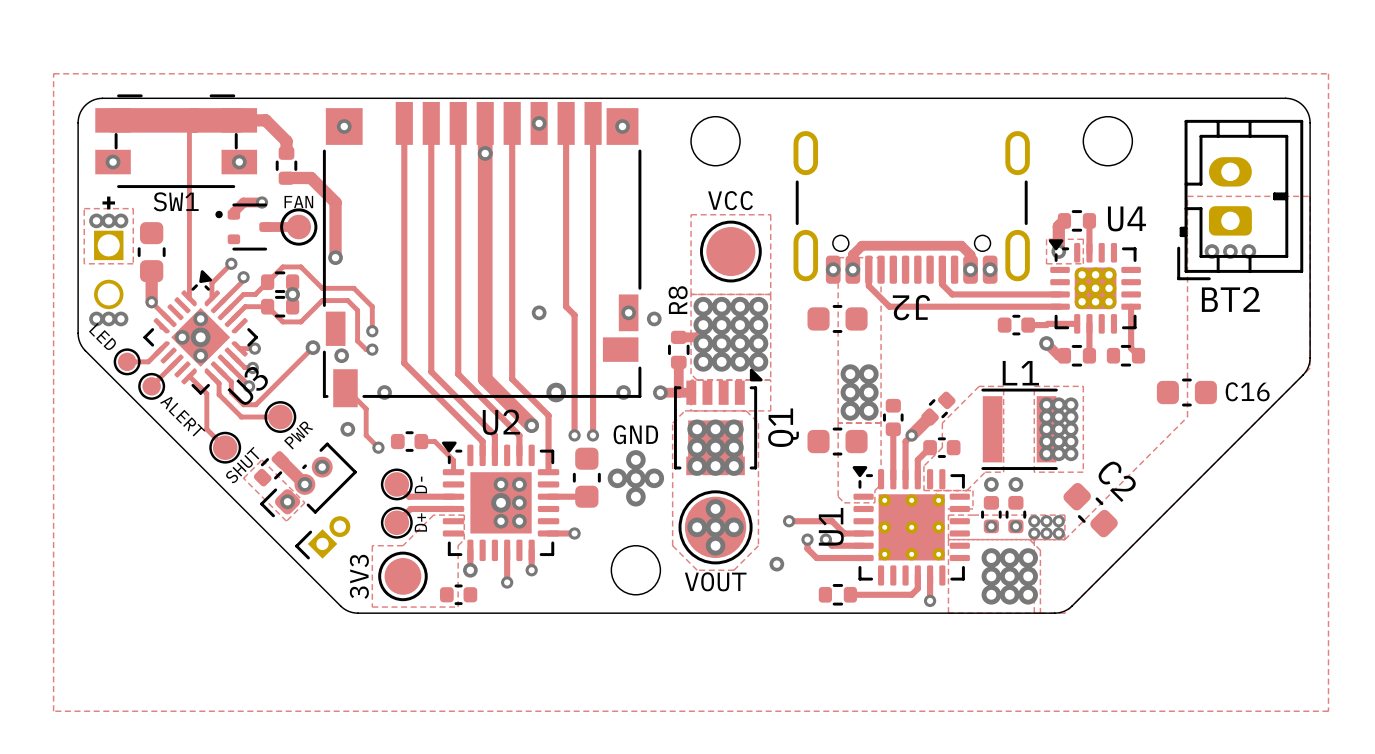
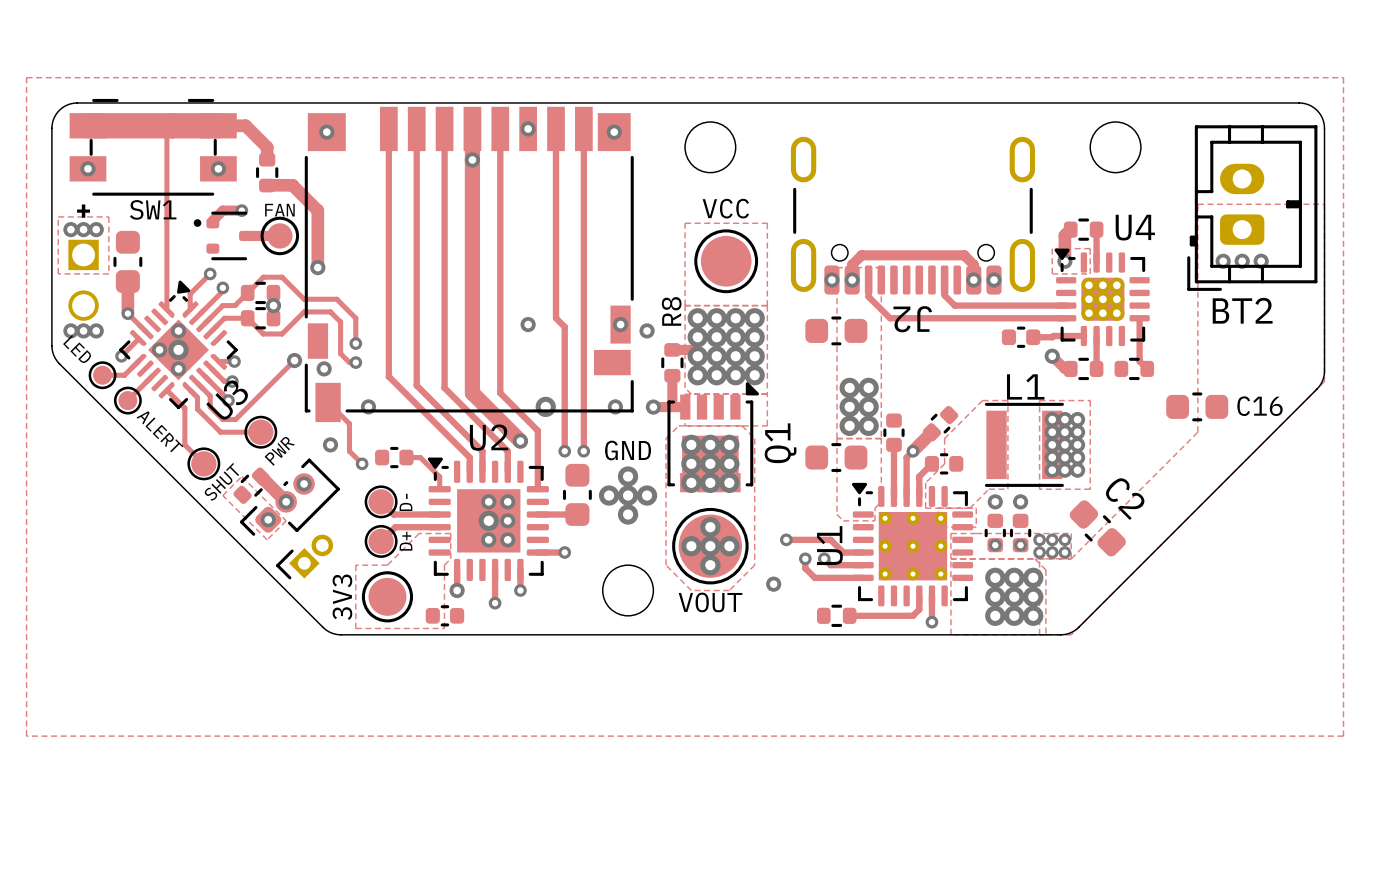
track: none -> (138, 339) (121, 356)
via: none -> (121, 356)

